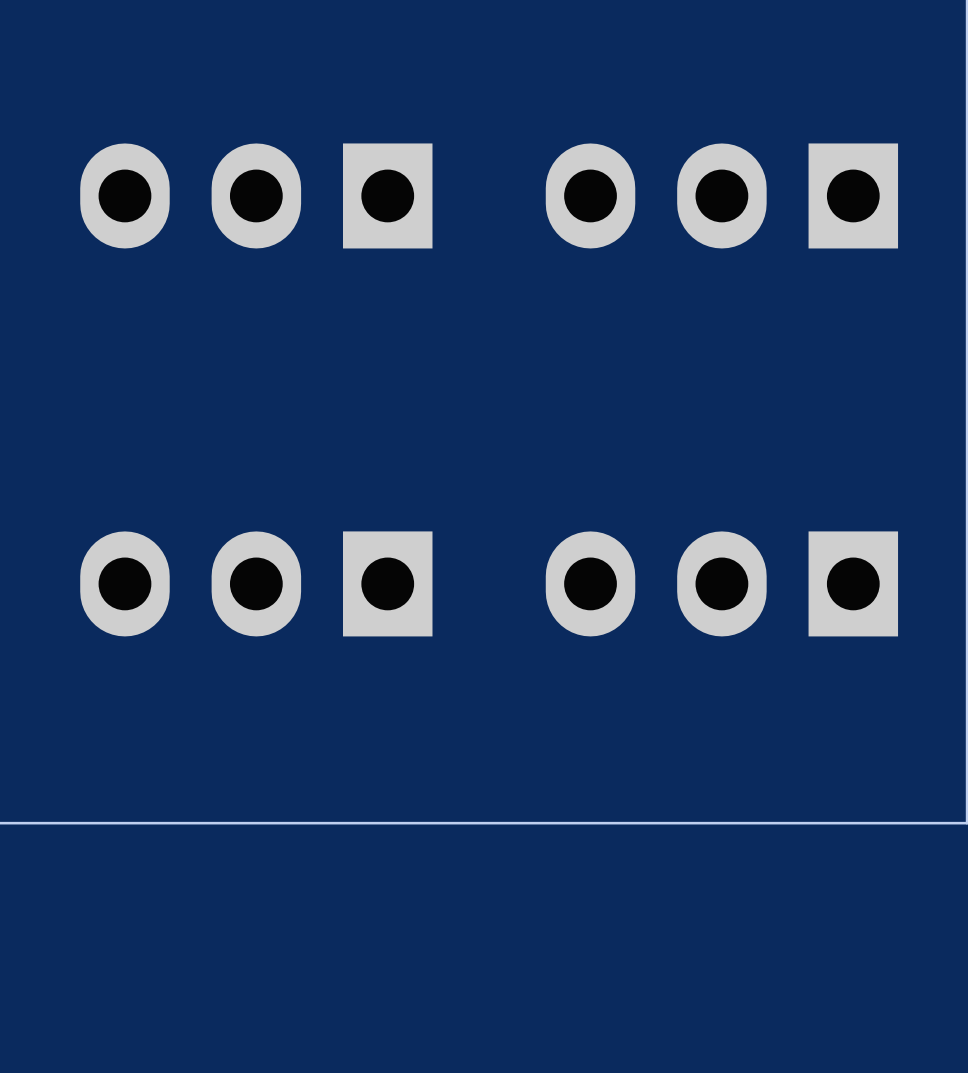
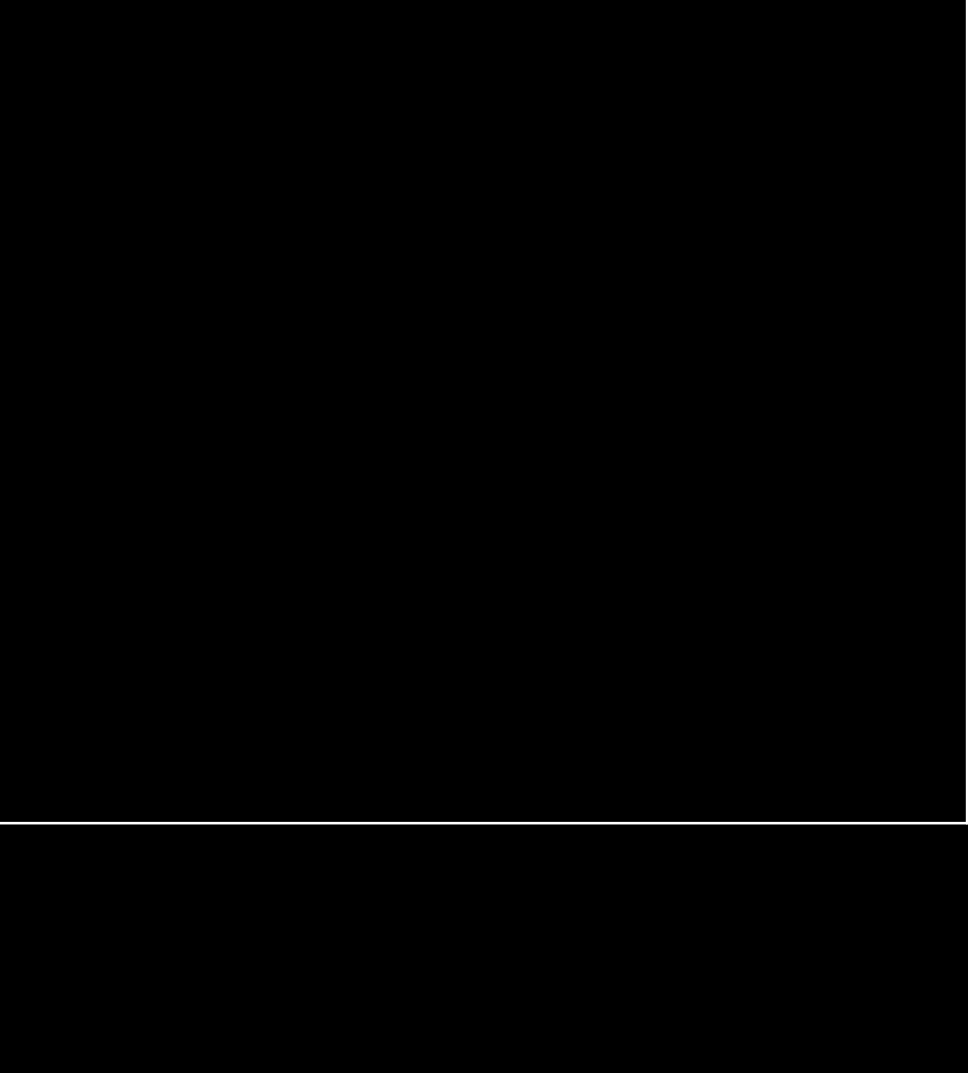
part: (256, 195) -> none
part: (721, 195) -> none
part: (256, 583) -> none
part: (721, 583) -> none

